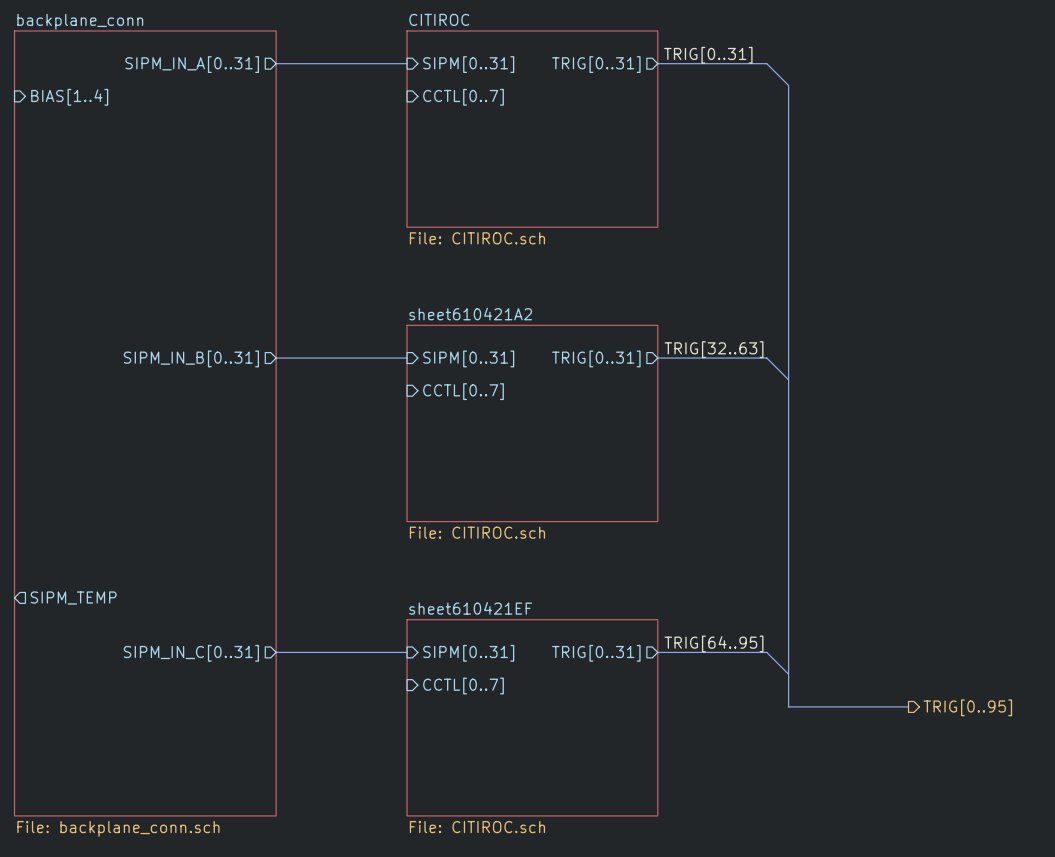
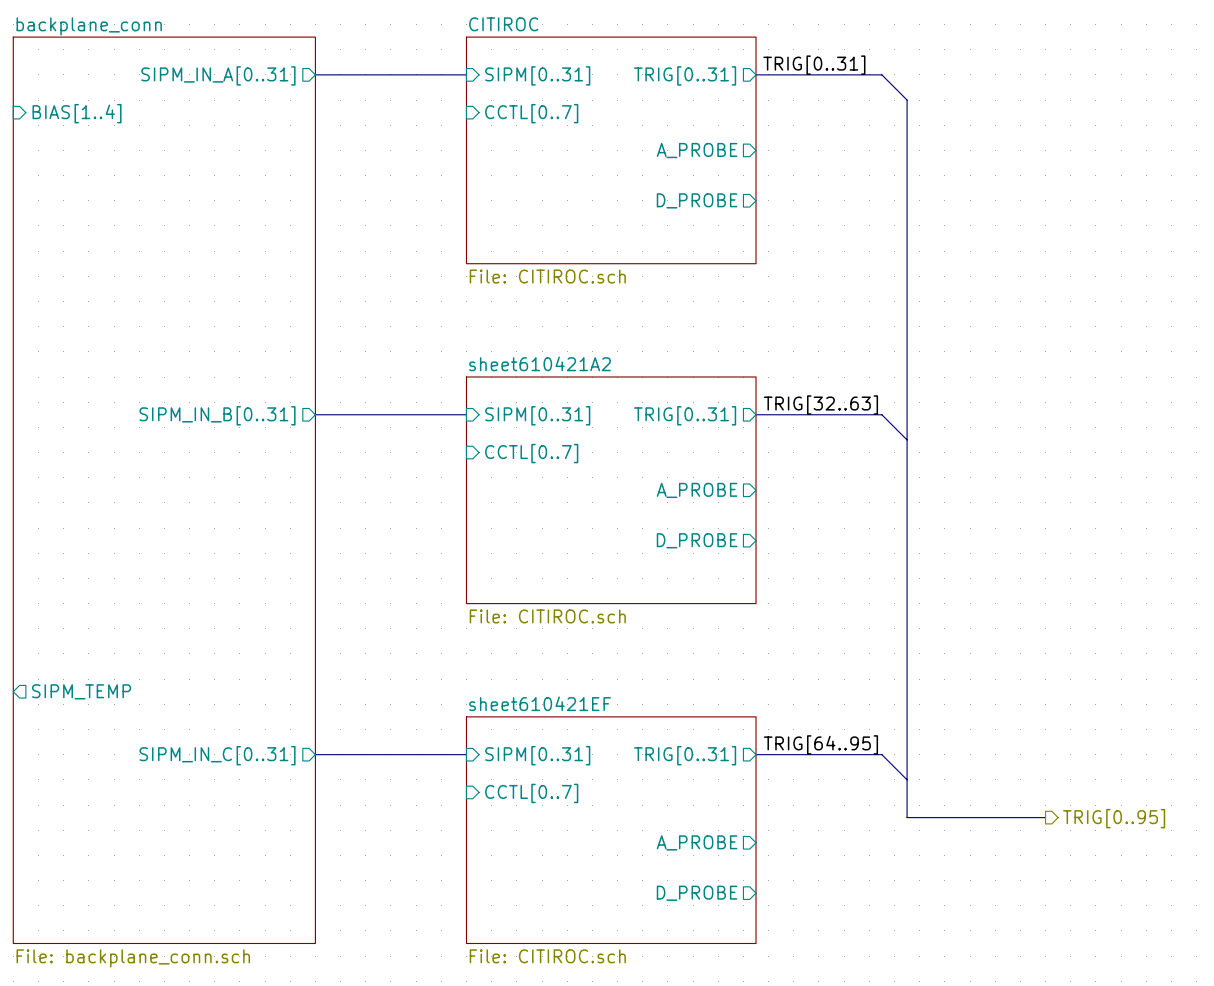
sheet pin: none -> A_PROBE (697, 150)
sheet pin: none -> D_PROBE (697, 200)
sheet pin: none -> A_PROBE (697, 490)
sheet pin: none -> D_PROBE (697, 540)
sheet pin: none -> A_PROBE (697, 842)
sheet pin: none -> D_PROBE (697, 893)

